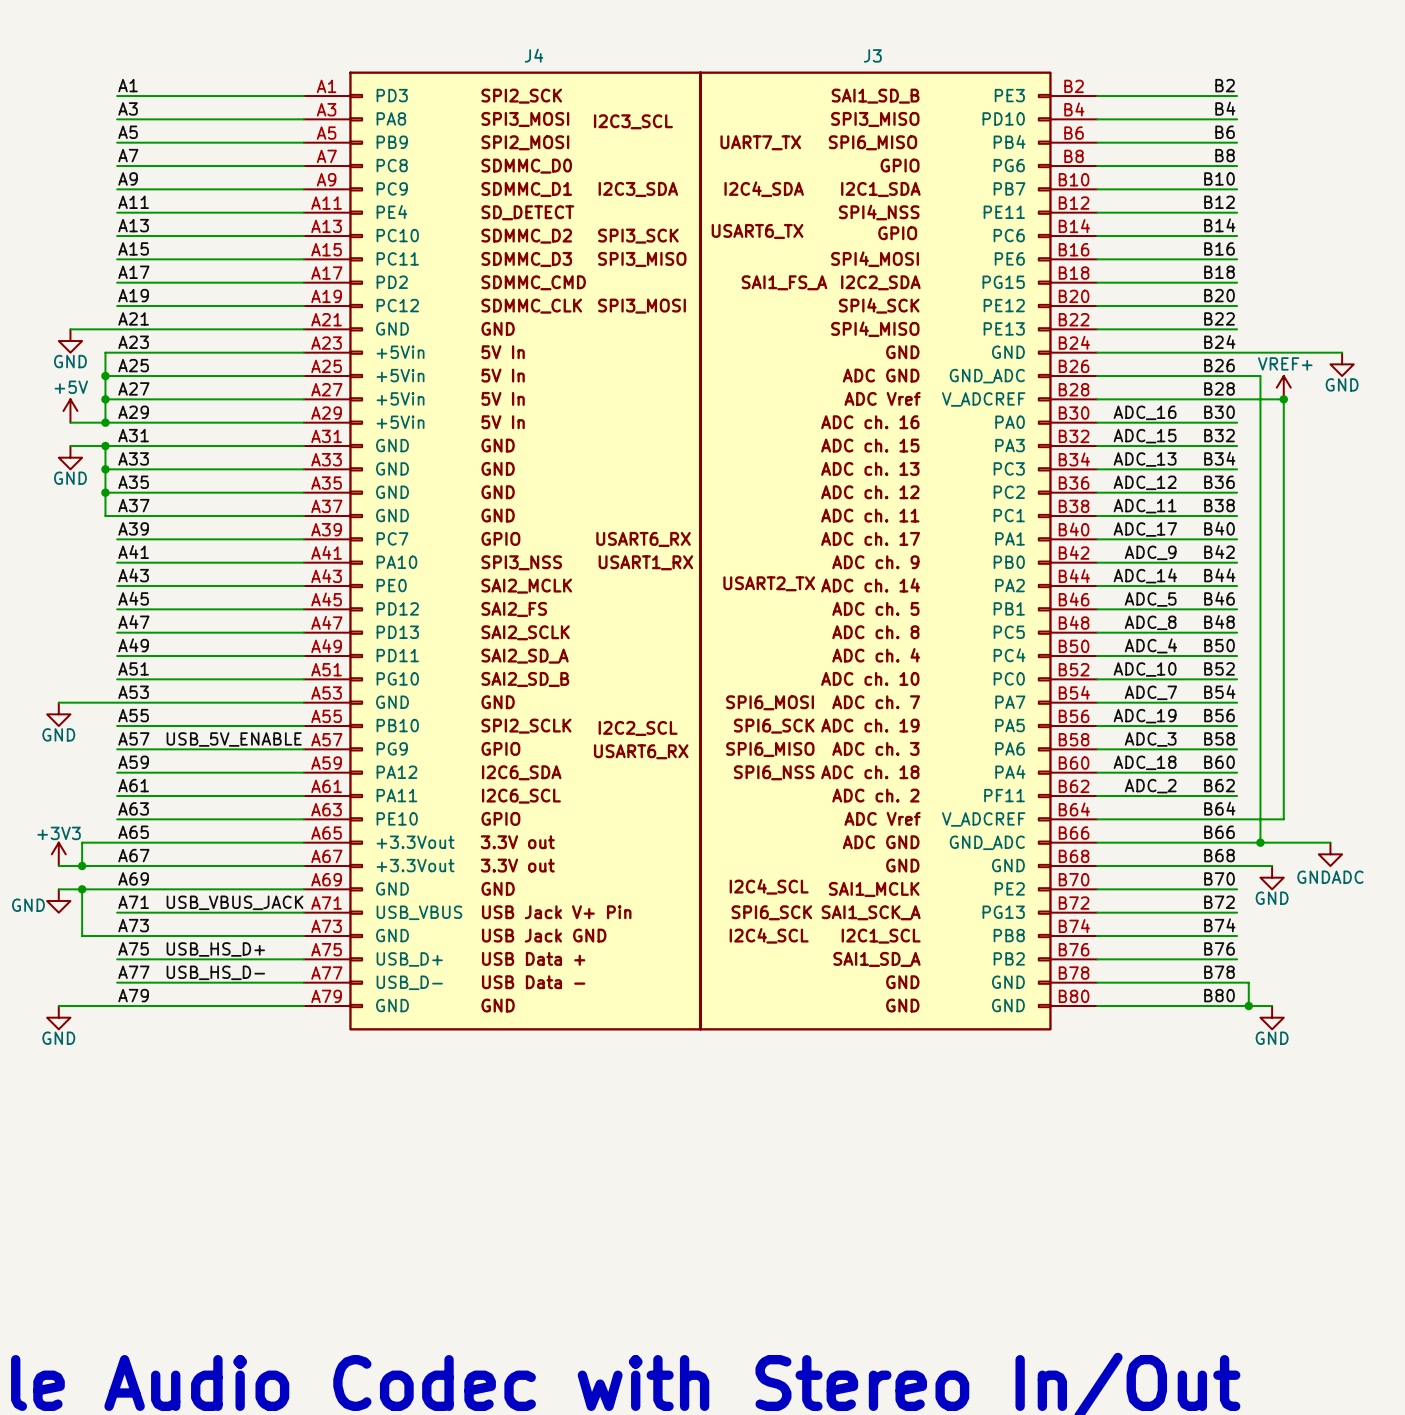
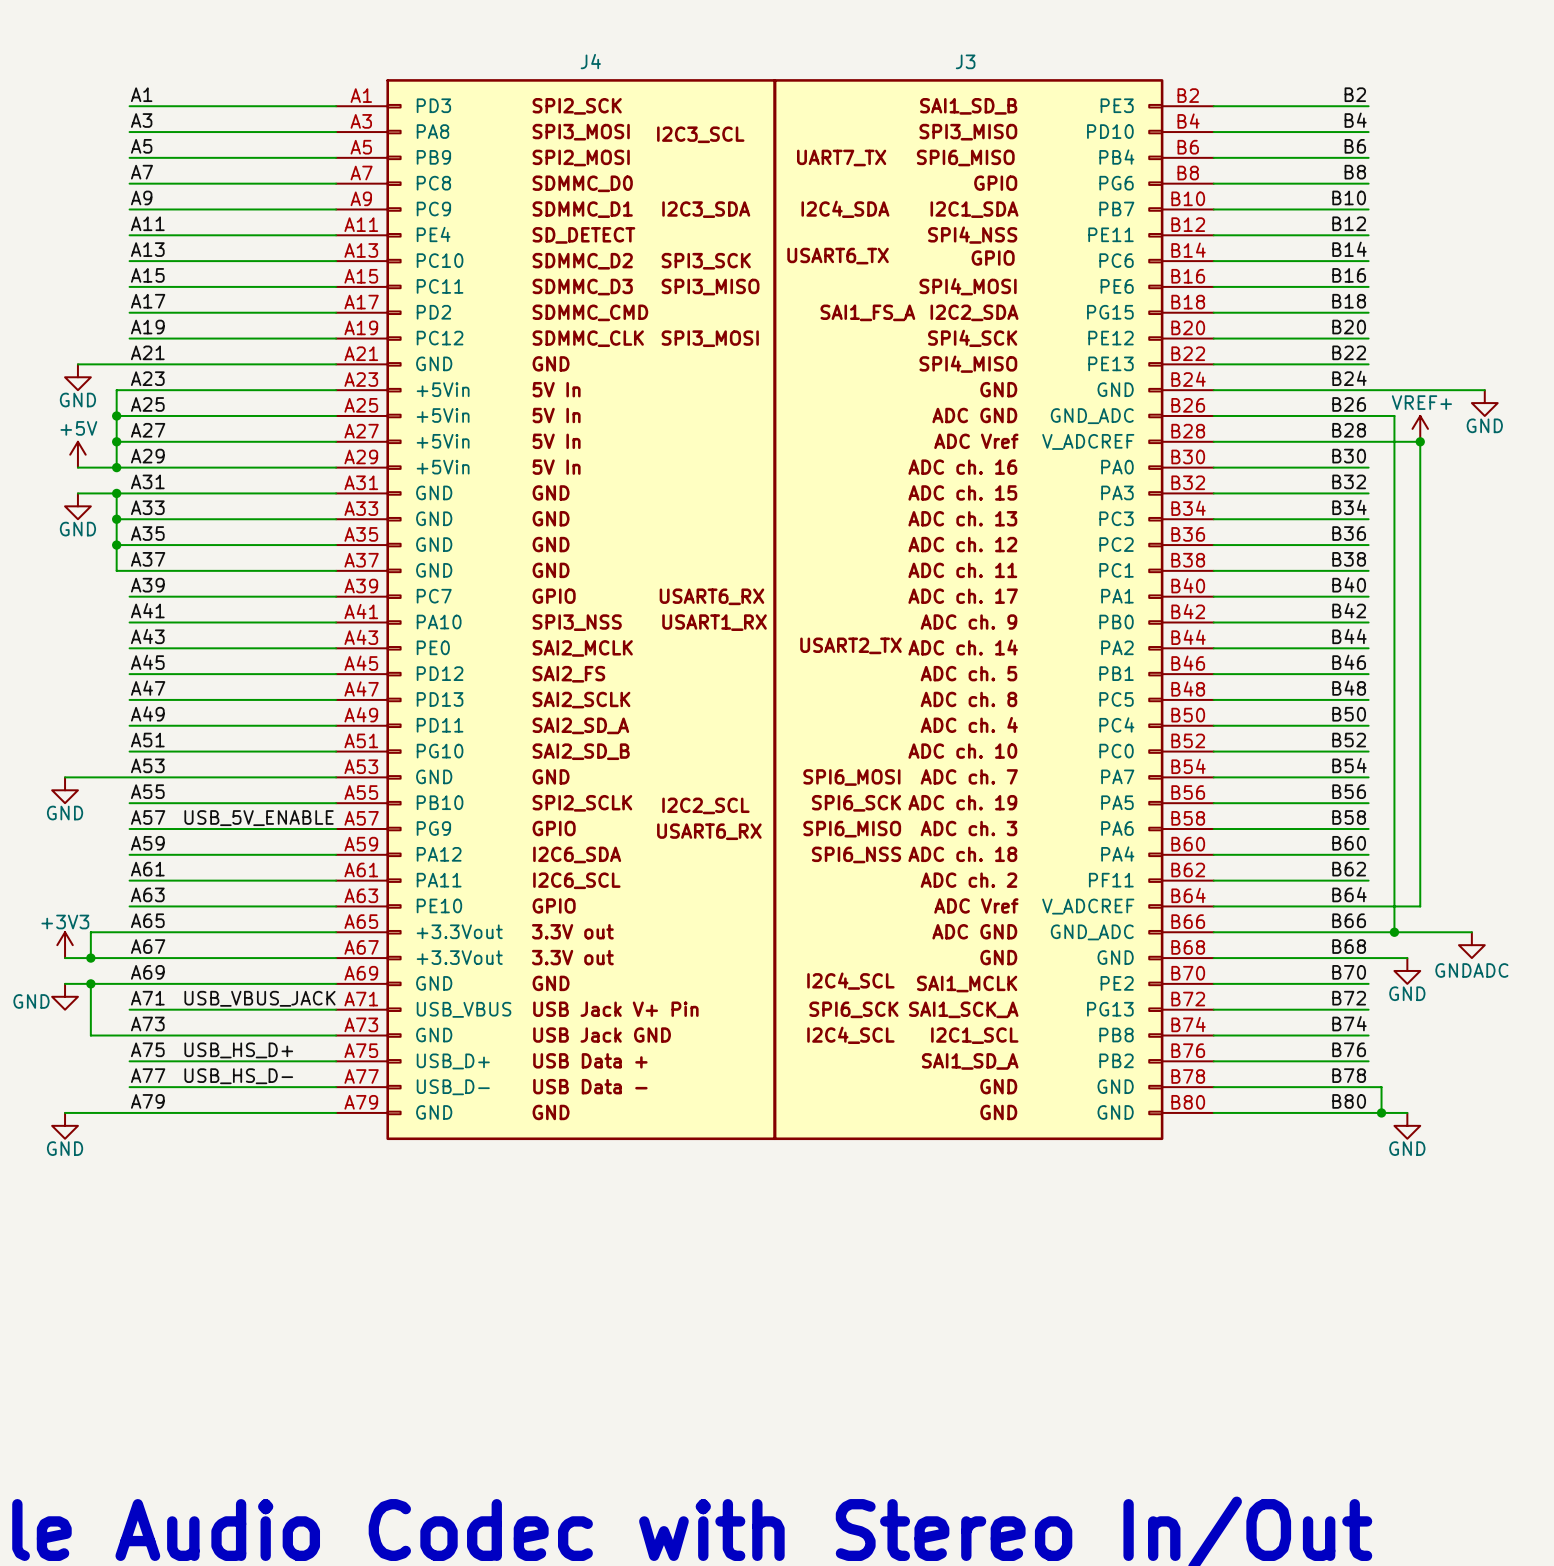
label: ADC_16 (1145, 412) -> none
label: ADC_15 (1145, 436) -> none
label: ADC_13 (1145, 459) -> none
label: ADC_12 (1145, 482) -> none
label: ADC_11 (1145, 506) -> none
label: ADC_17 (1145, 529) -> none
label: ADC_9 (1150, 552) -> none
label: ADC_14 (1145, 575) -> none
label: ADC_5 (1150, 599) -> none
label: ADC_8 (1150, 622) -> none
label: ADC_4 (1150, 645) -> none
label: ADC_10 (1145, 669) -> none
label: ADC_7 (1150, 692) -> none
label: ADC_19 (1145, 716) -> none
label: ADC_3 (1150, 739) -> none
label: ADC_18 (1145, 762) -> none
label: ADC_2 (1150, 786) -> none

